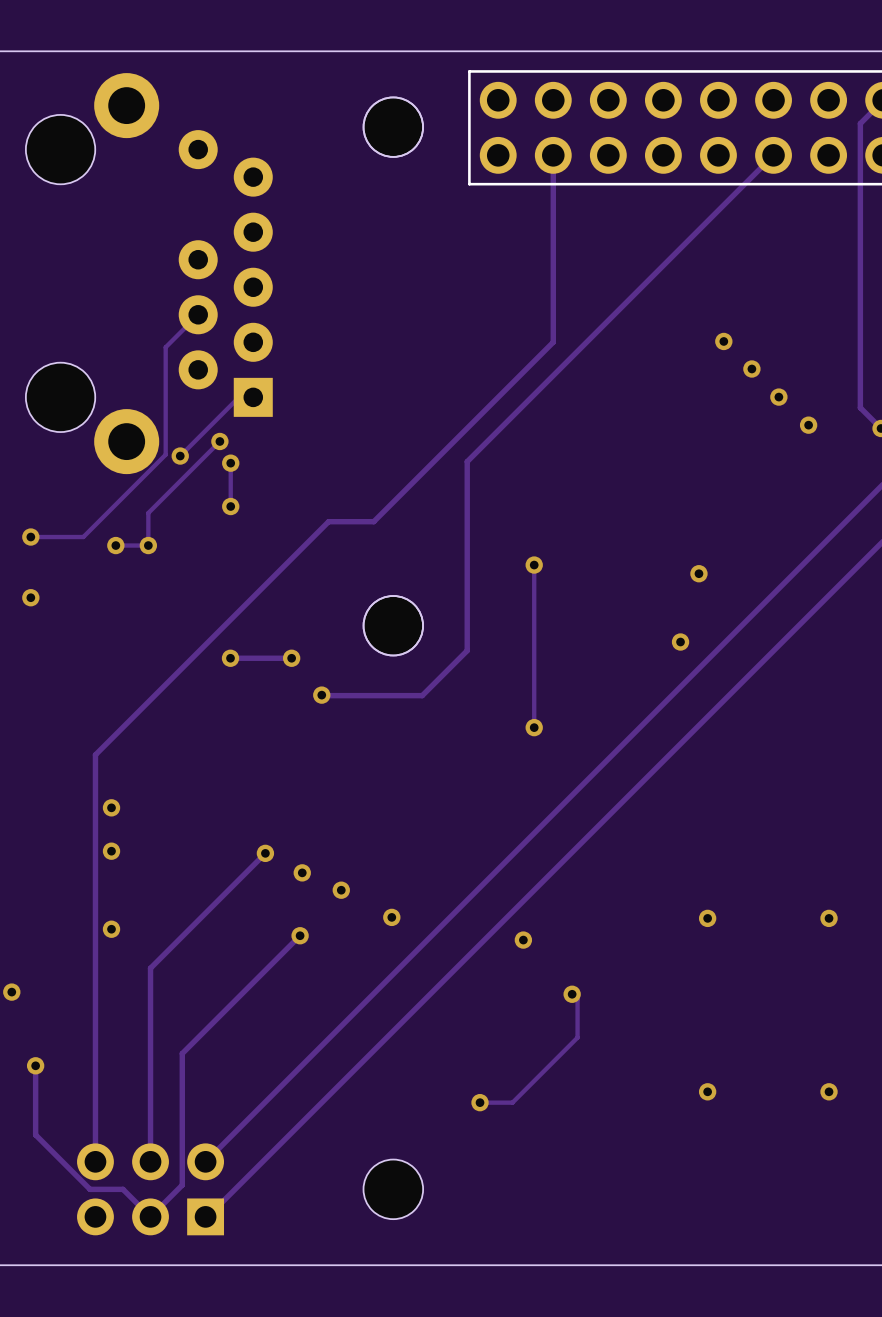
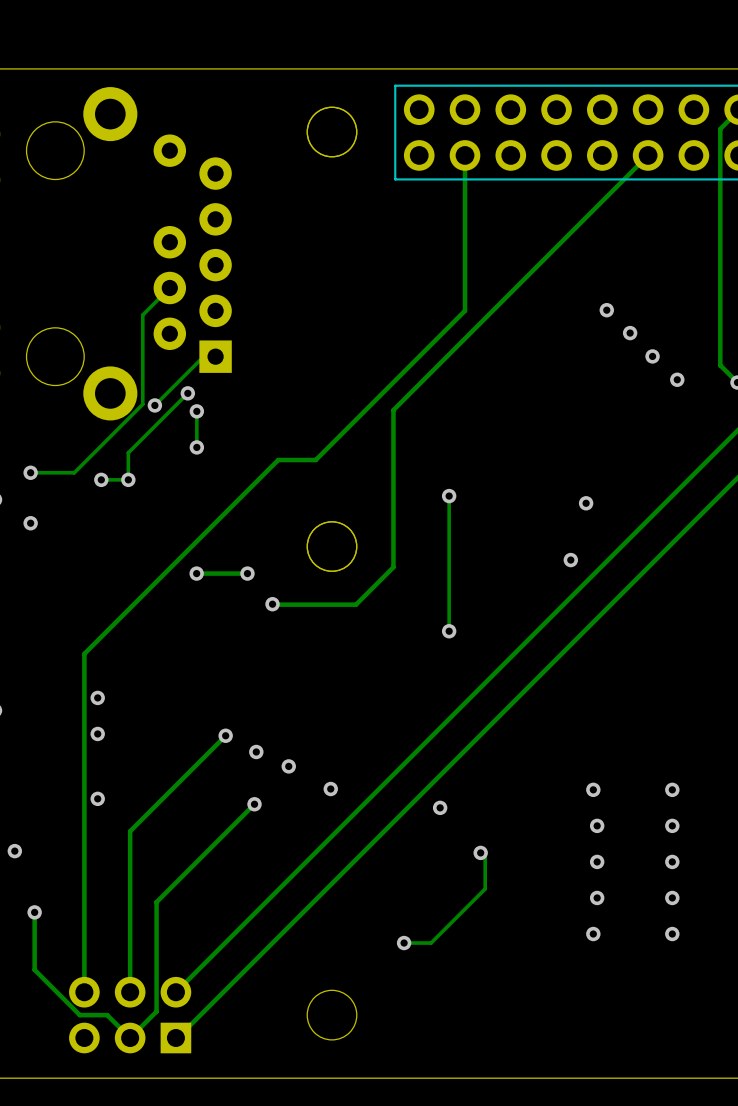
via: none -> (672, 789)
via: (829, 918) -> none
via: none -> (597, 825)
via: none -> (672, 825)
via: none -> (597, 861)
via: none -> (672, 861)
via: none -> (597, 897)
via: none -> (672, 897)
via: none -> (672, 934)
via: (829, 1091) -> none

